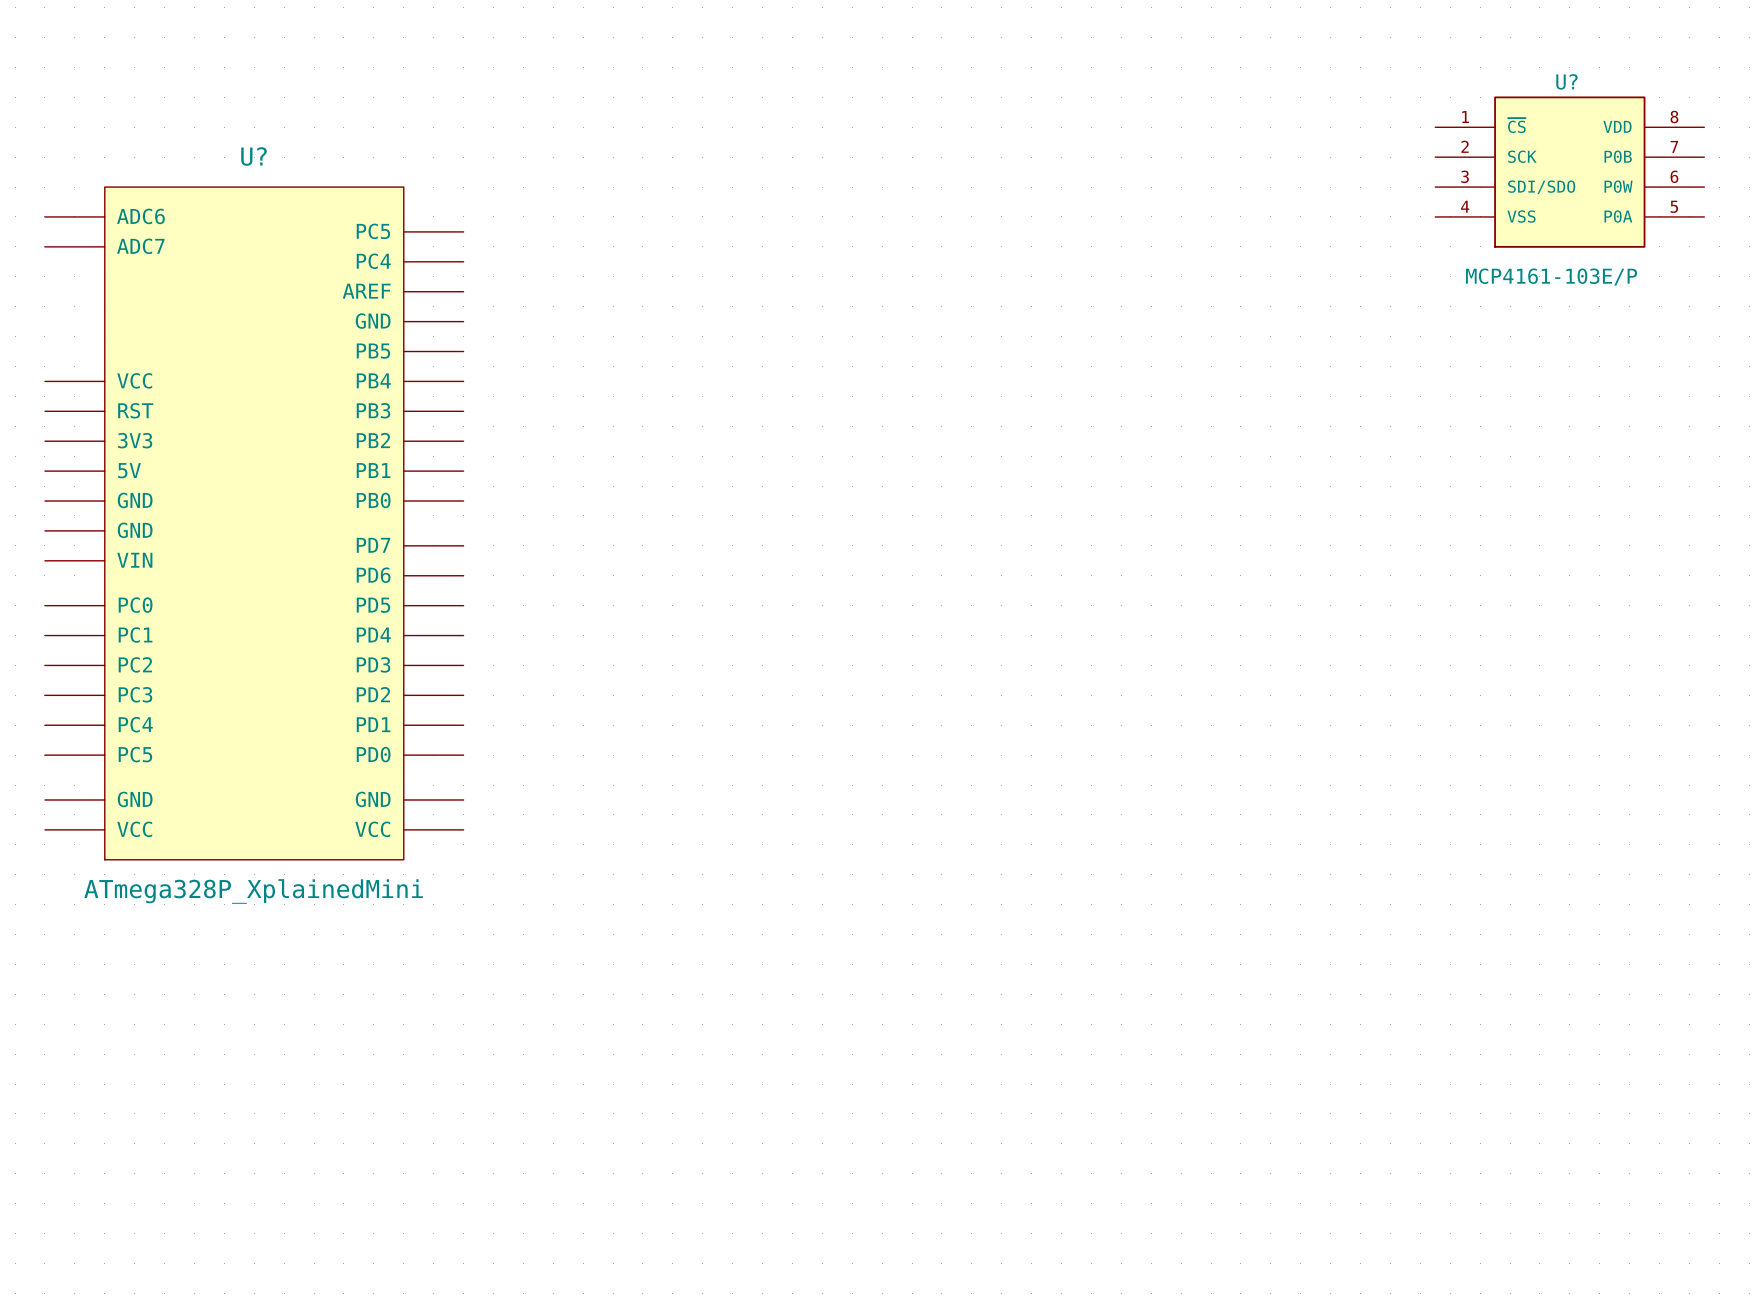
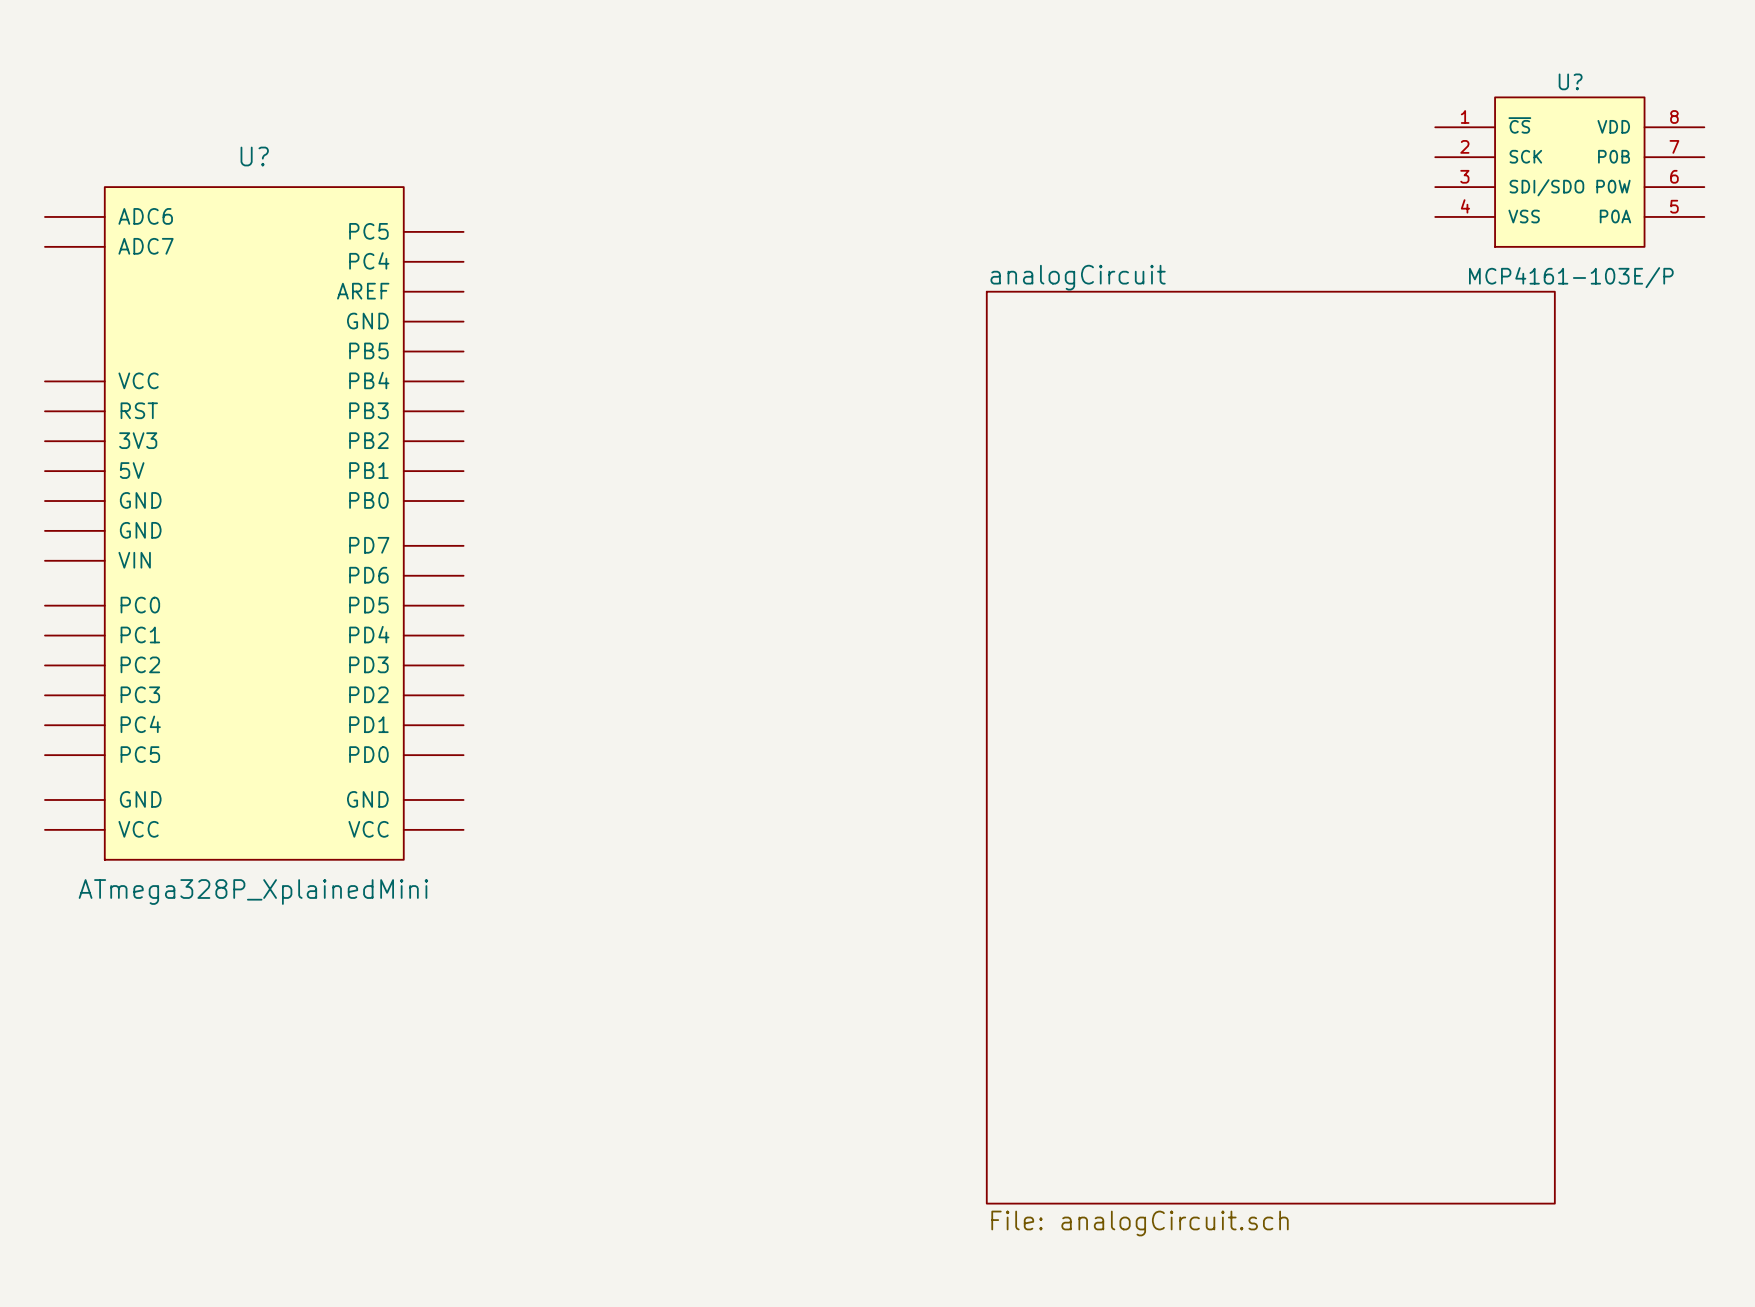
sheet analogCircuit: none -> File: analogCircuit.sch (1270, 747)

